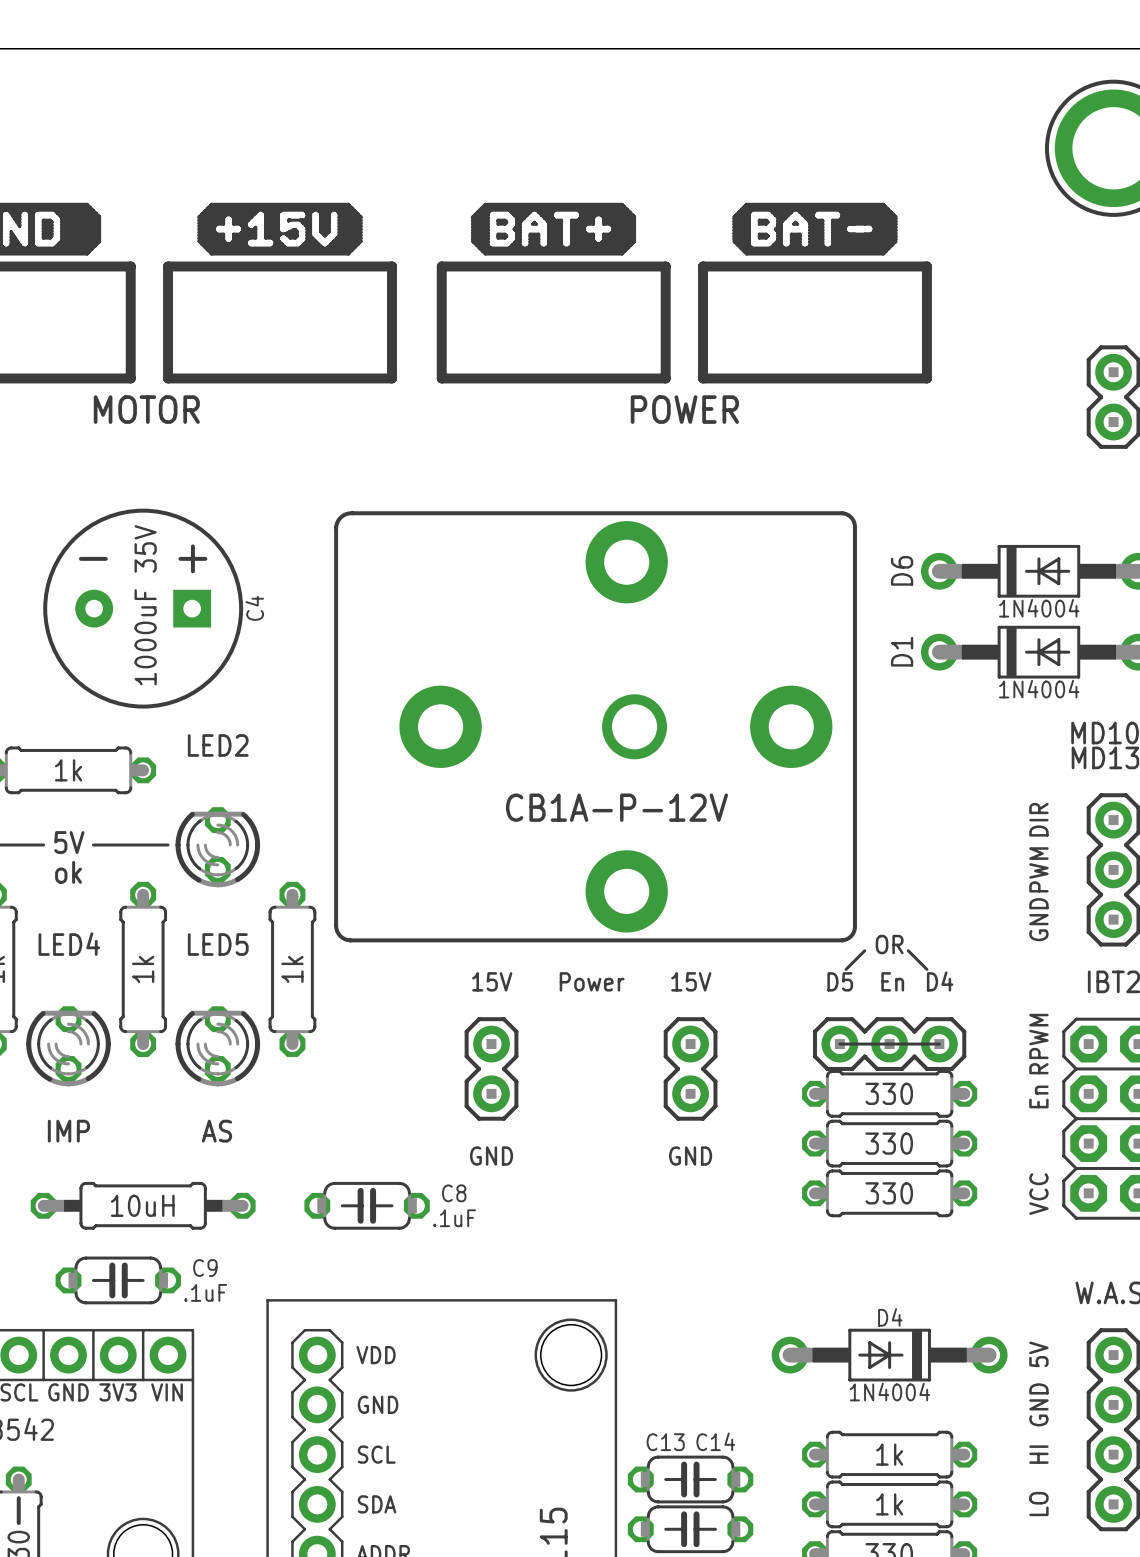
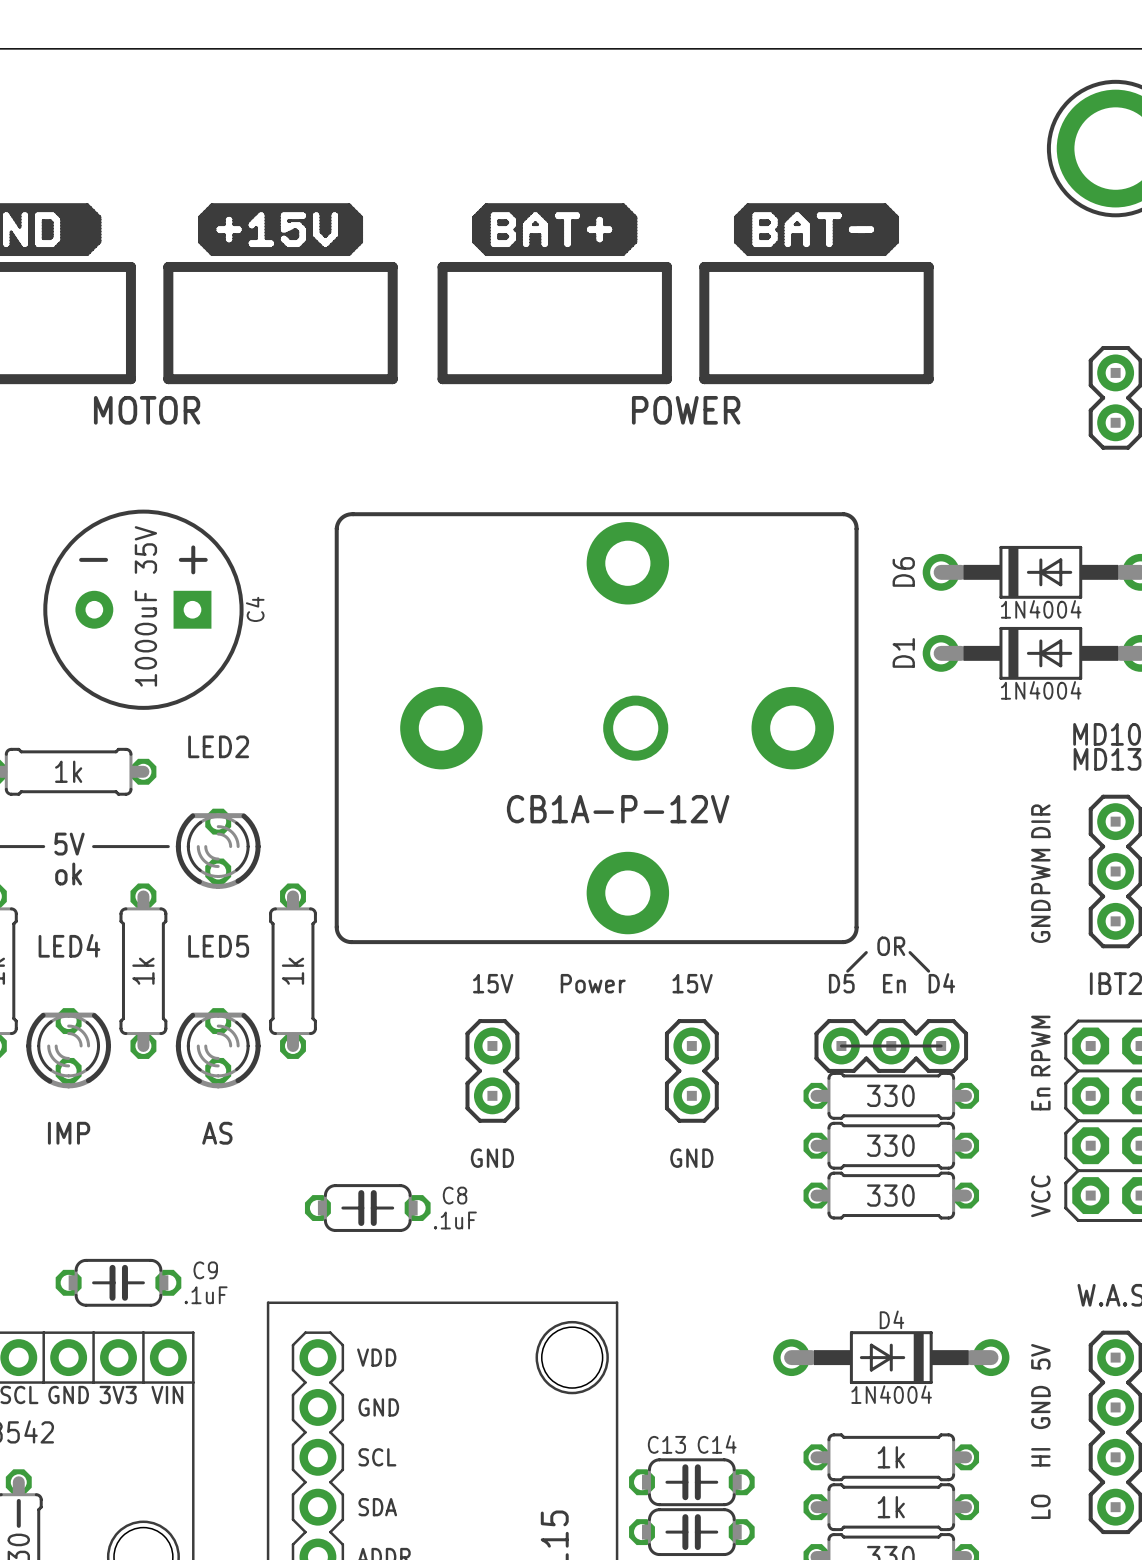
part: 10uH (143, 1205) -> none

